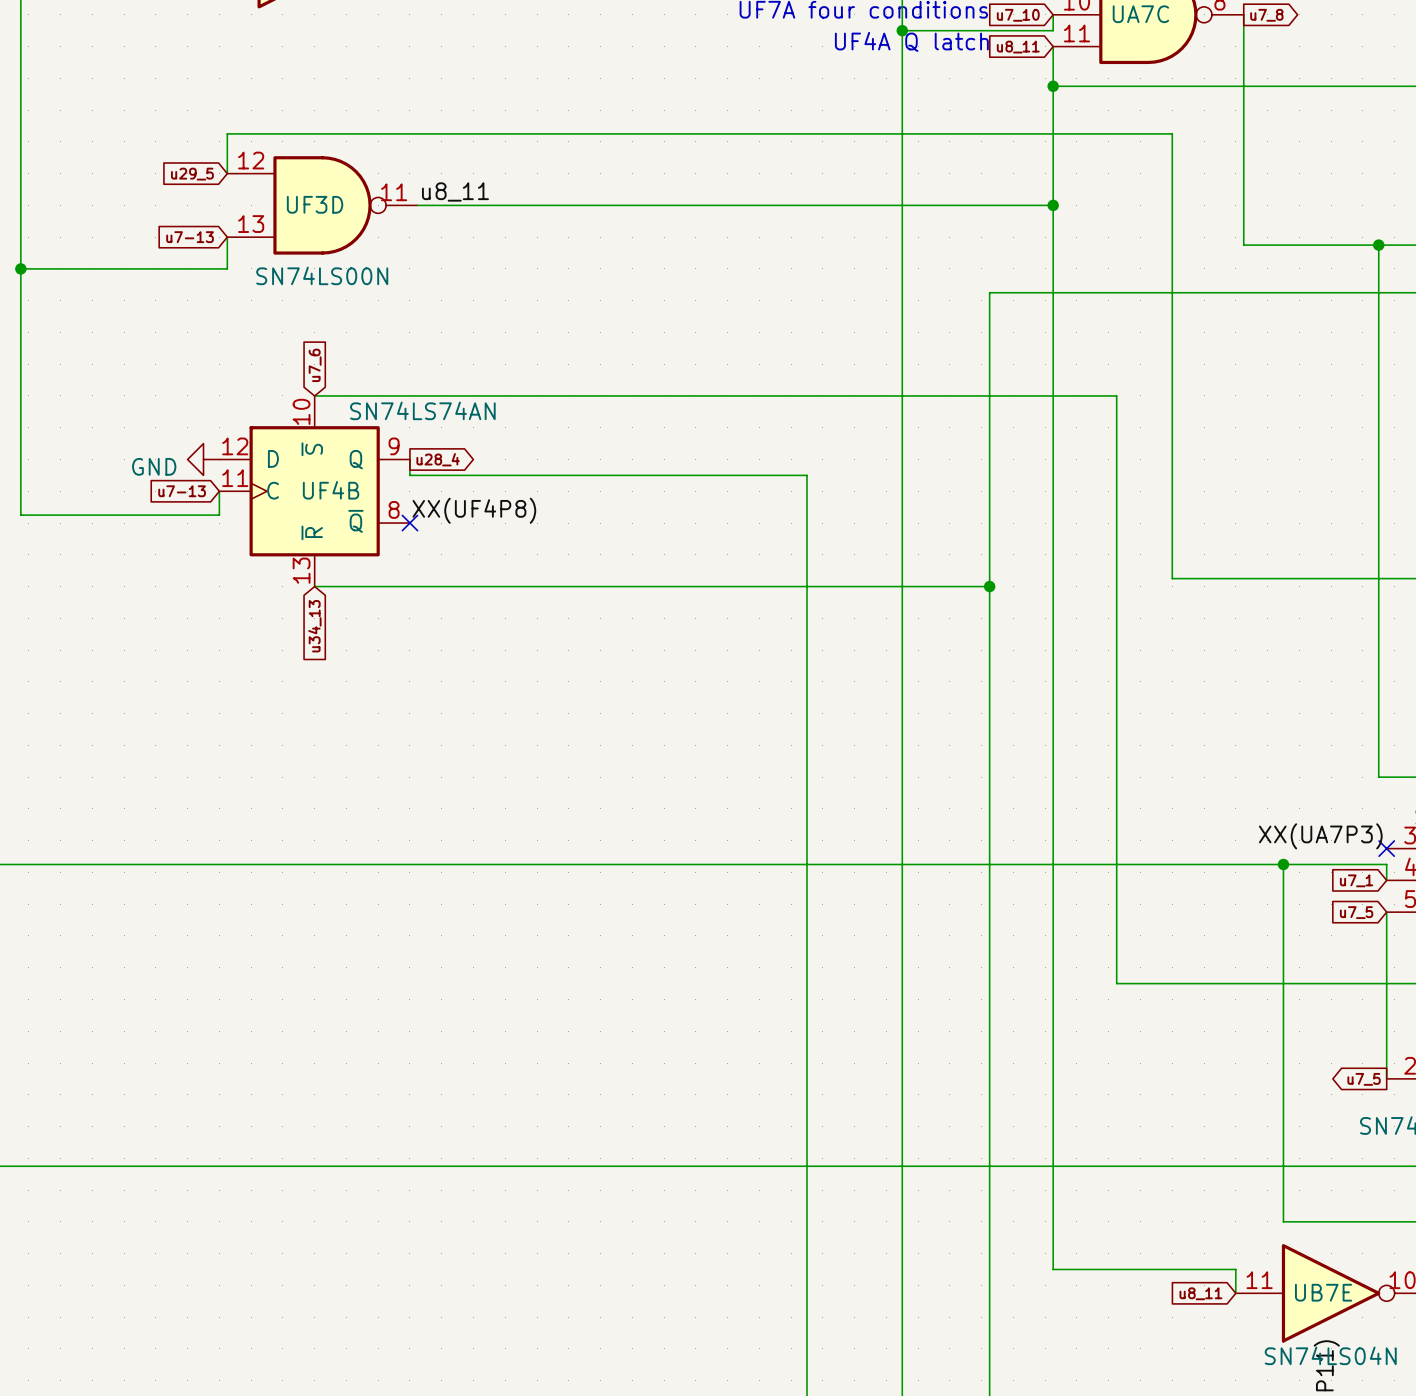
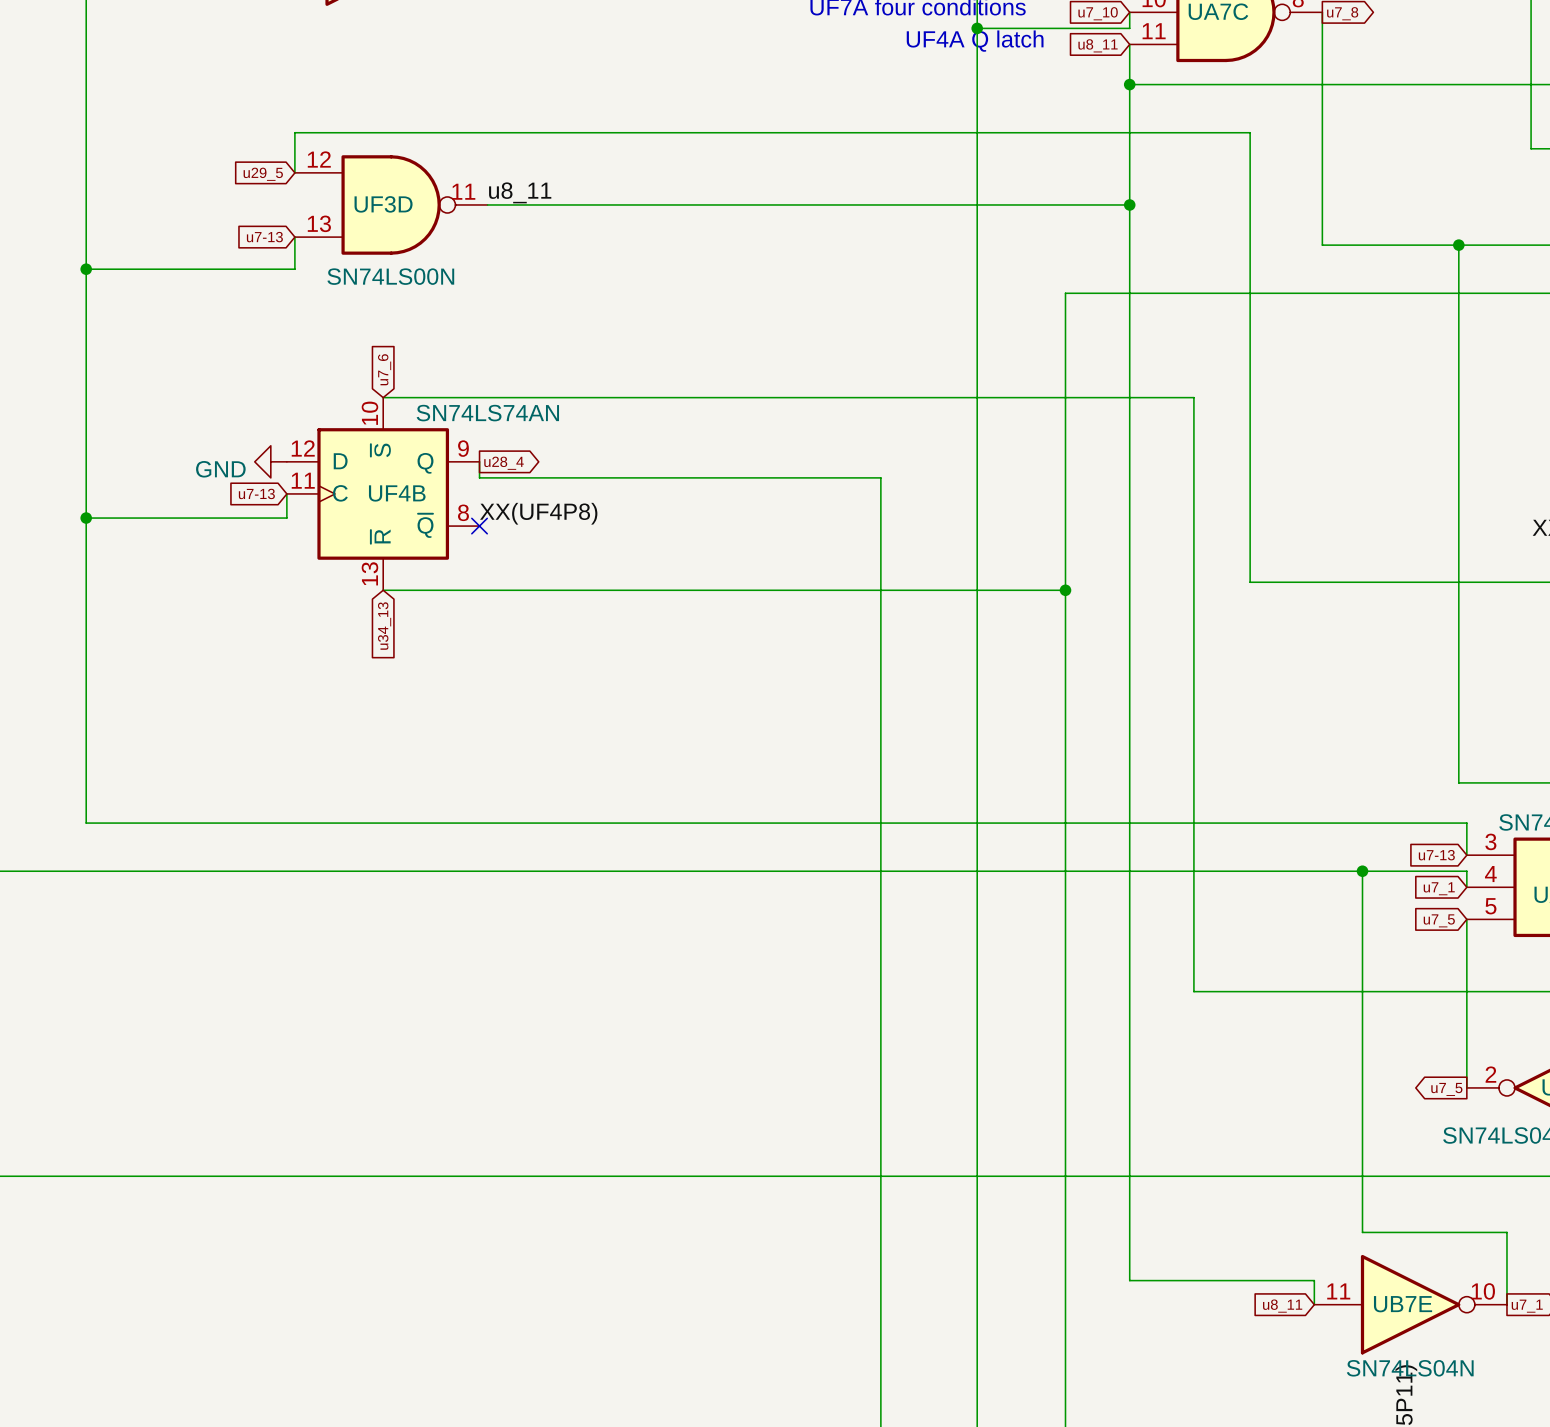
wire: none -> (86, 518) (86, 823) (1466, 823) (1466, 855)
junction: none -> (86, 518)
label: XX(UA7P3) (1320, 836) -> none
global label: none -> u7-13 (1436, 855)
no-connect mark: (1386, 848) -> none

